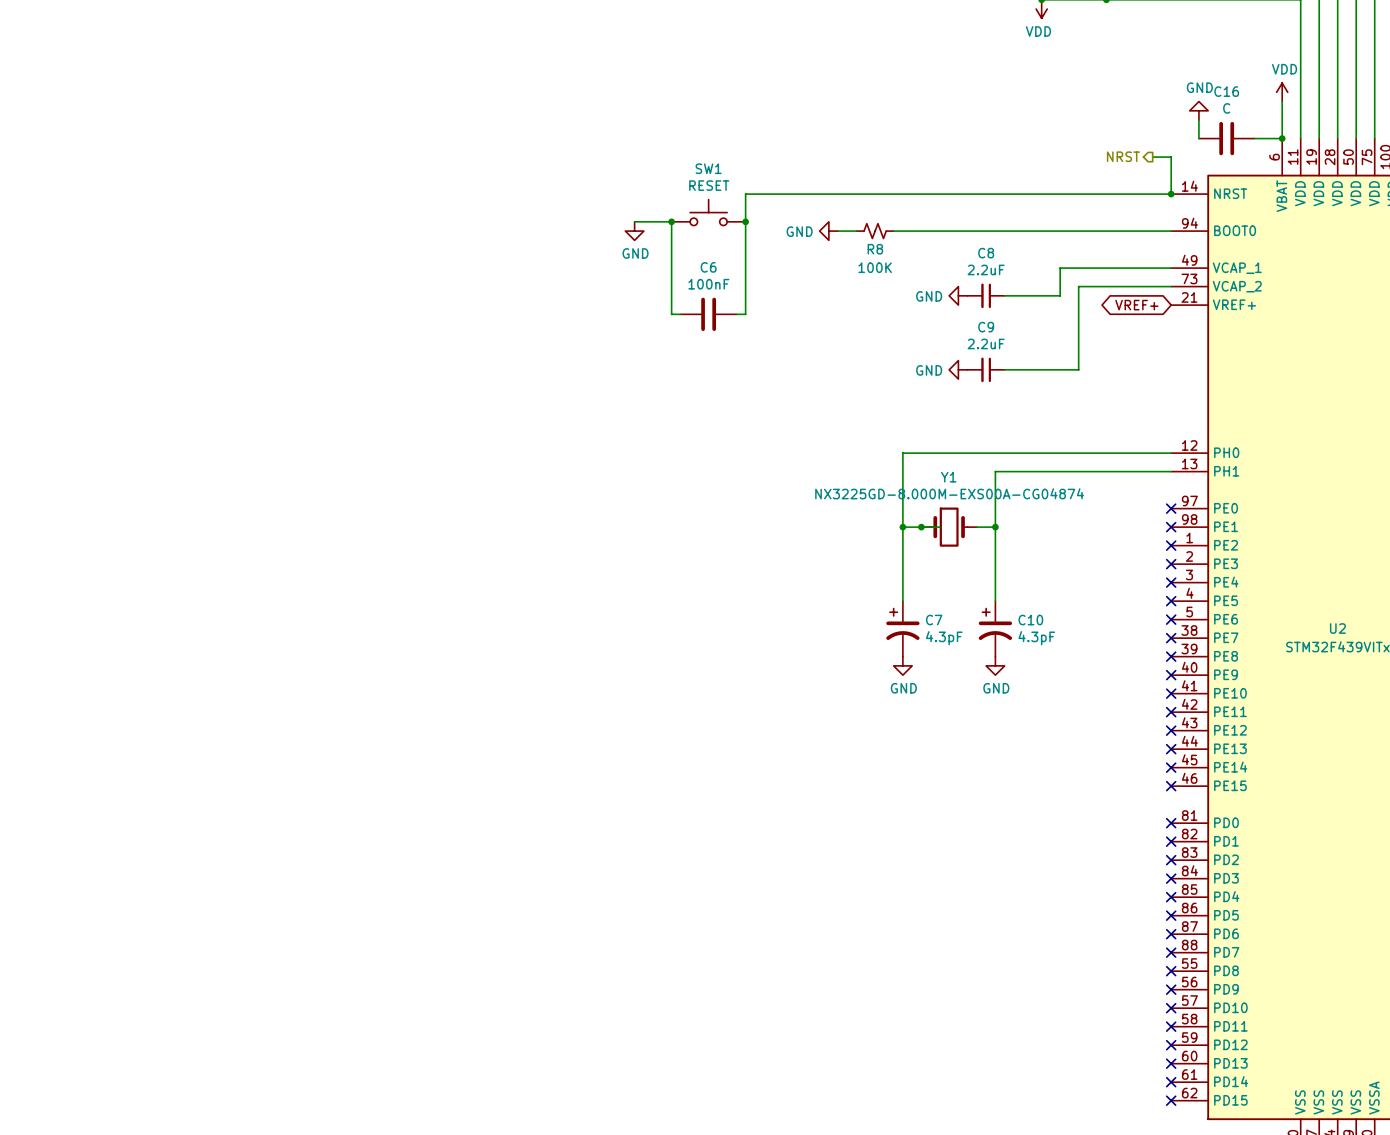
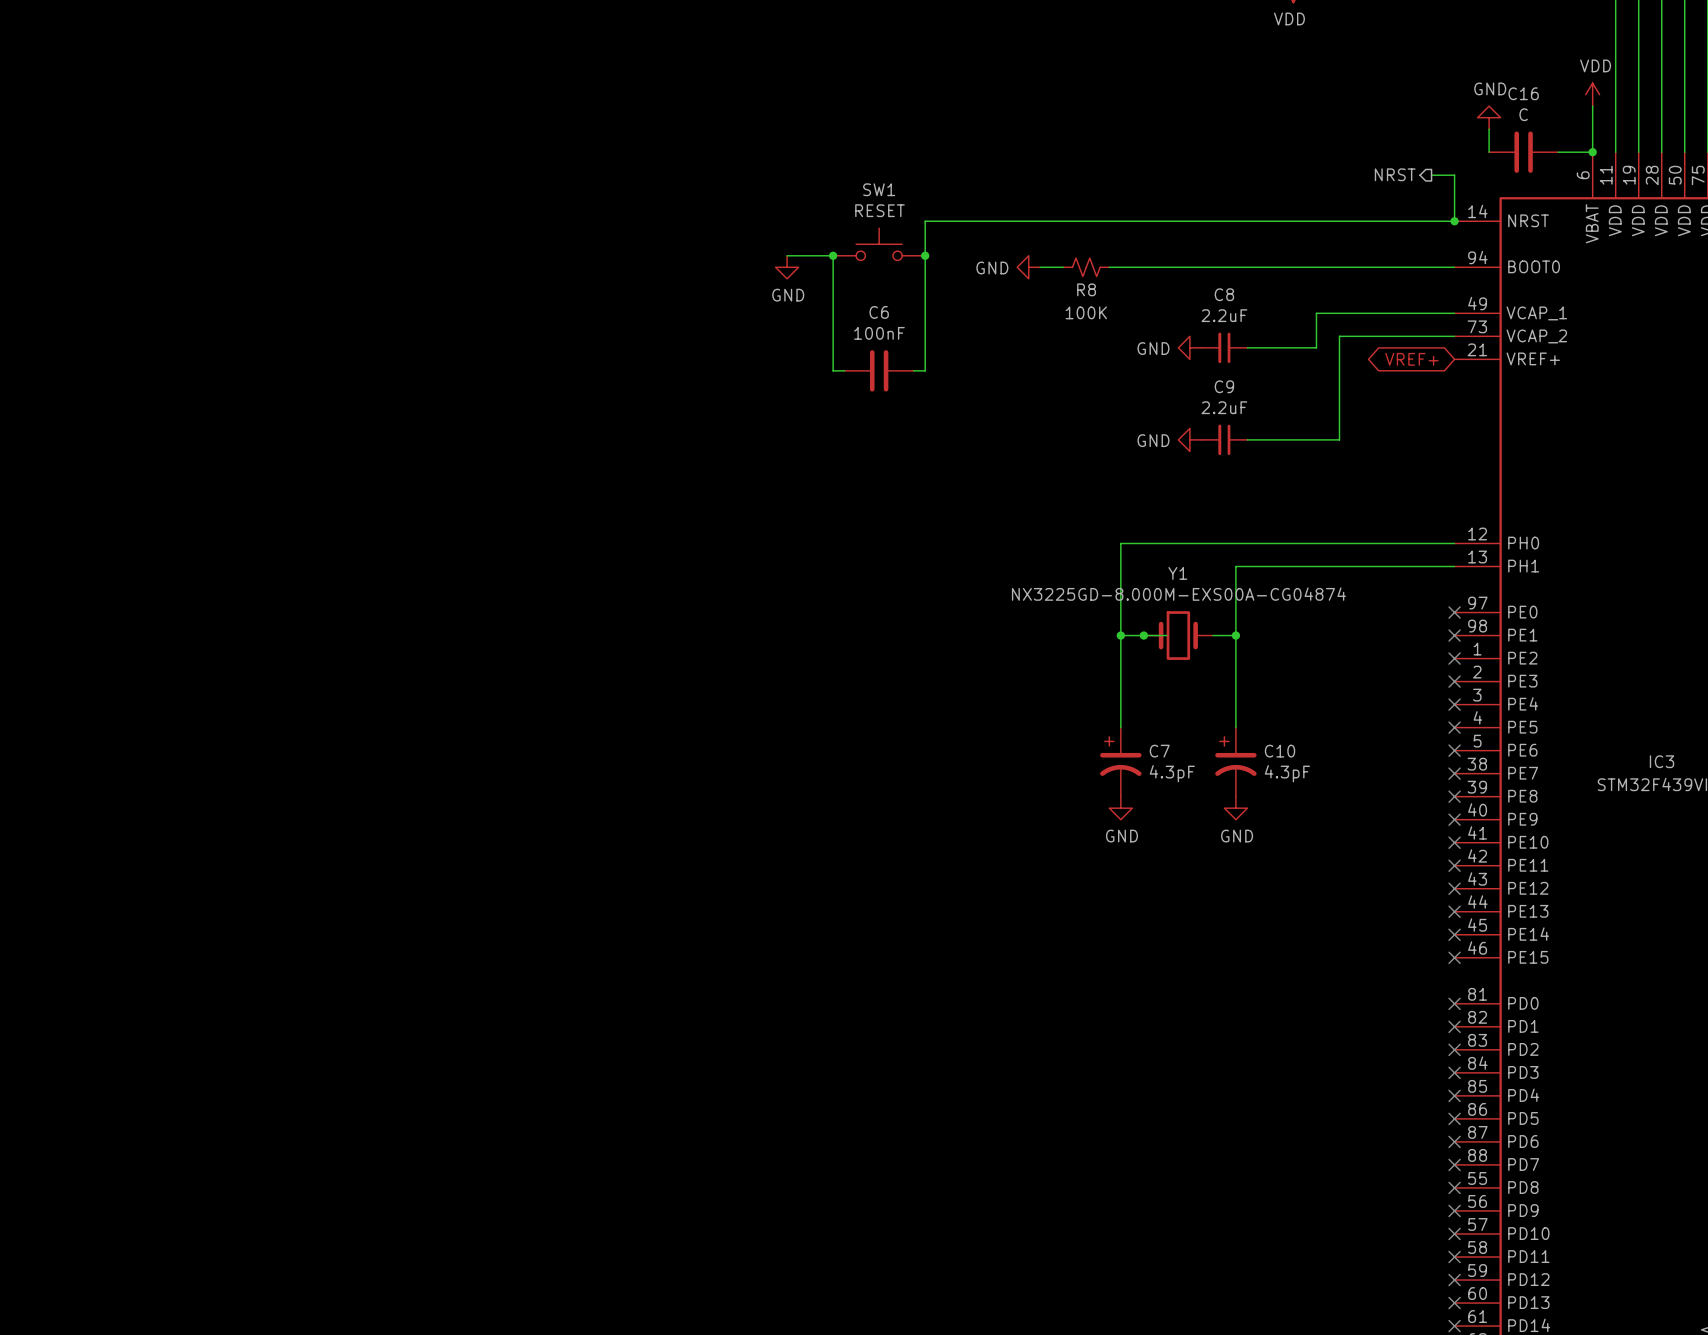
U2 name: U2 (1337, 628) -> IC3 (1661, 761)

